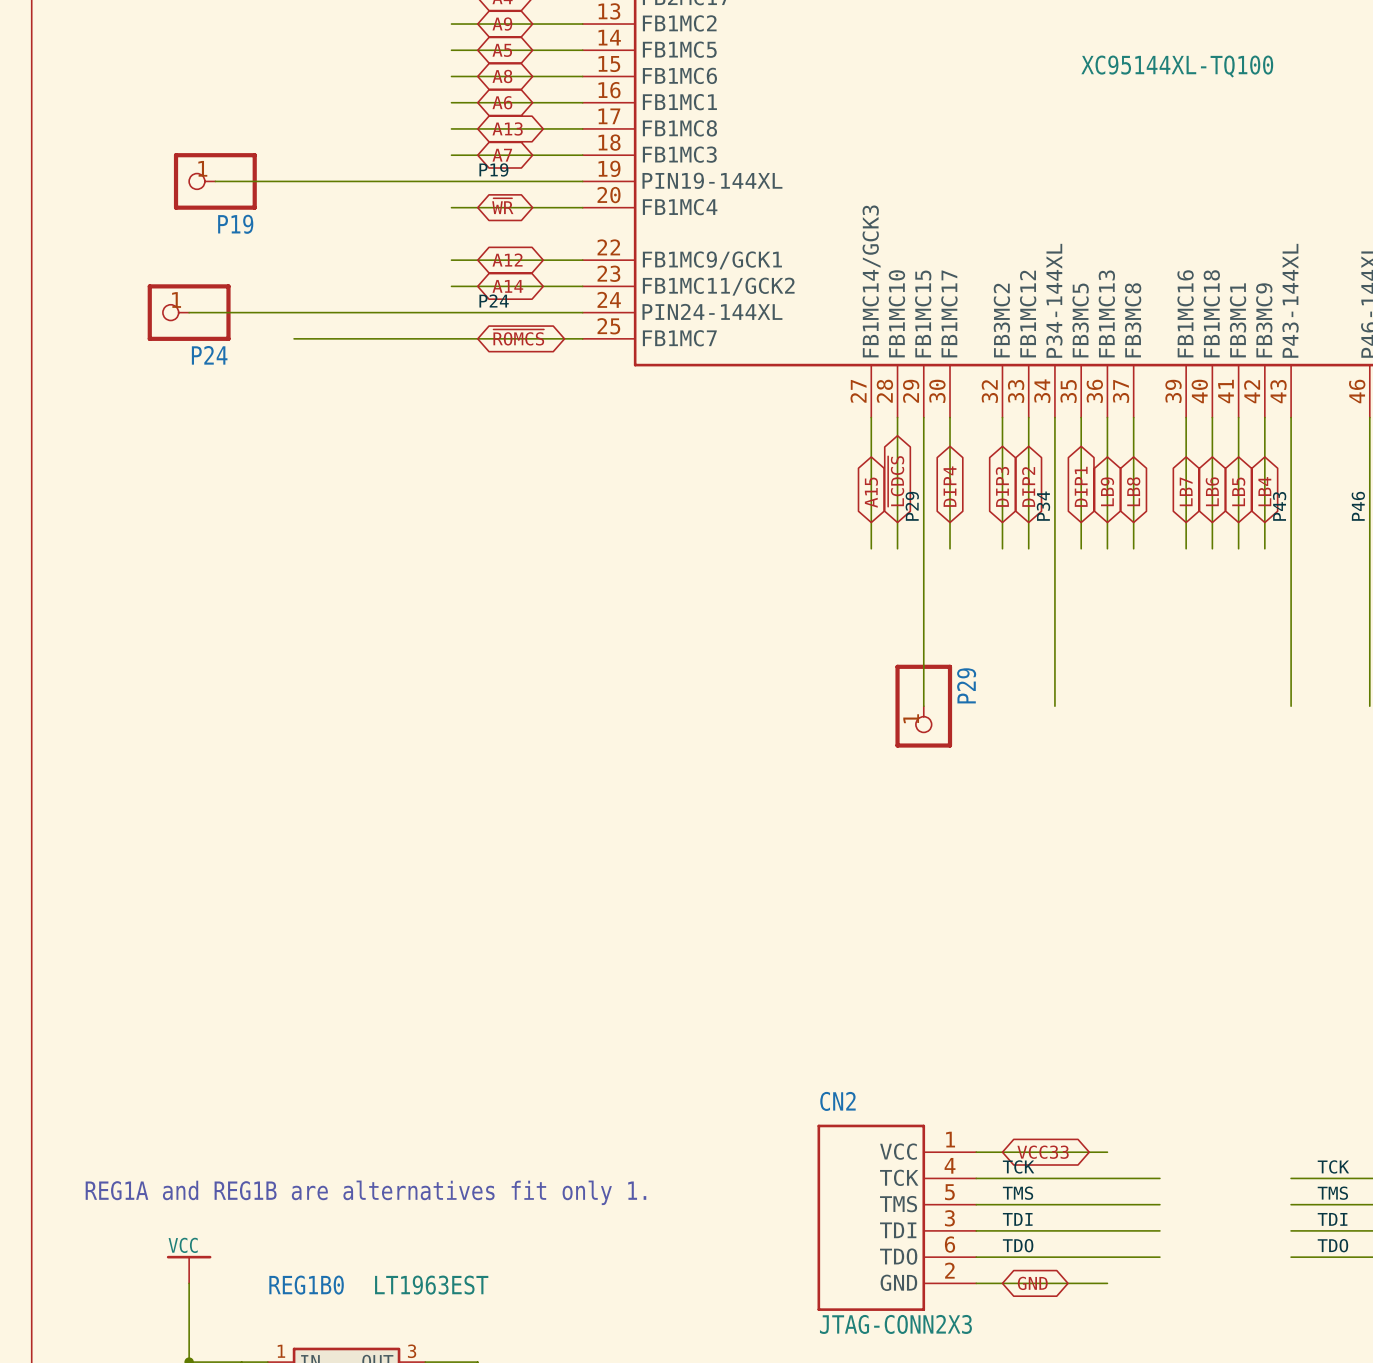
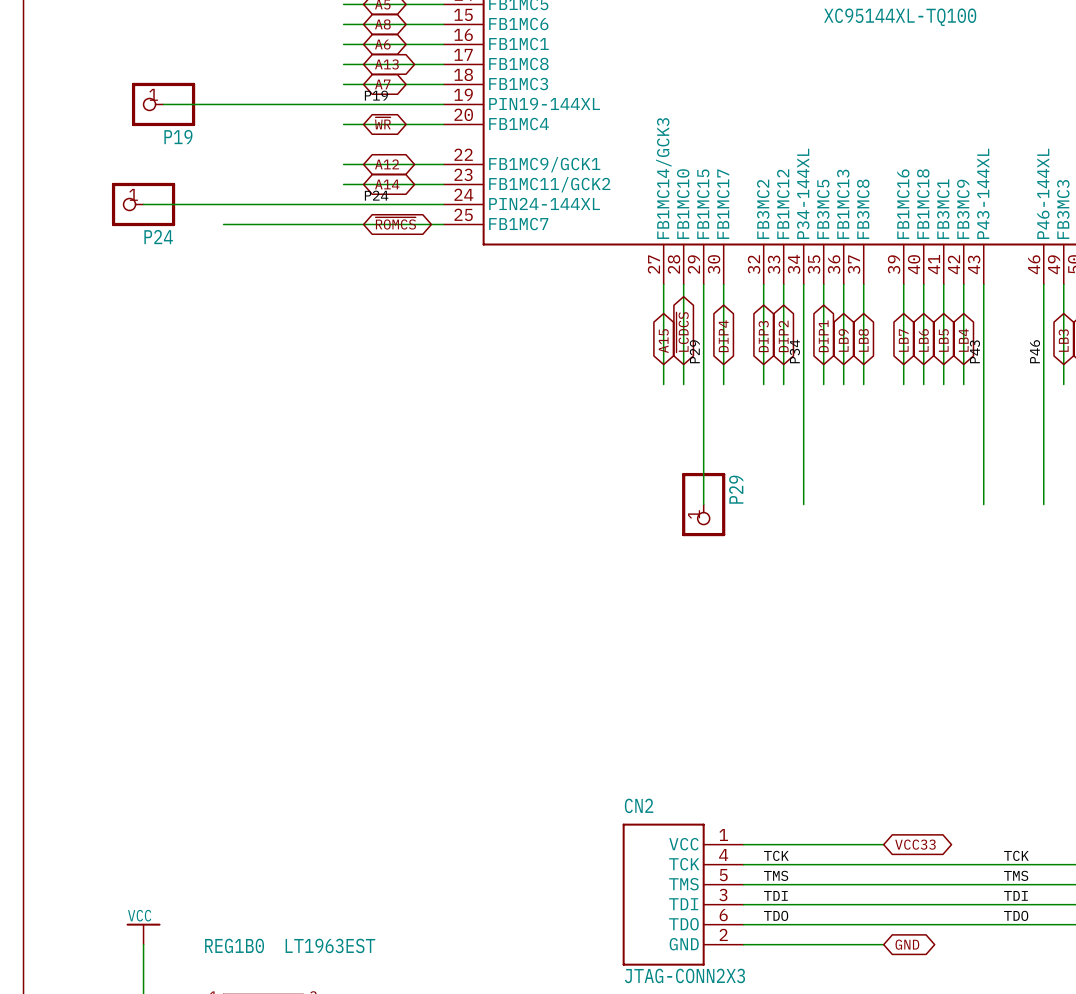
global label position: VCC33 (1043, 1152) -> VCC33 (915, 844)
wire: none -> (843, 844) (883, 844)
wire: none -> (883, 864) (983, 864)
text: REG1A and REG1B are alternatives fit only 1. (365, 1192) -> none
wire: none -> (883, 884) (983, 884)
wire: none -> (883, 904) (983, 904)
wire: none -> (883, 924) (983, 924)
global label position: GND (1032, 1283) -> GND (907, 944)
wire: none -> (843, 944) (883, 944)

